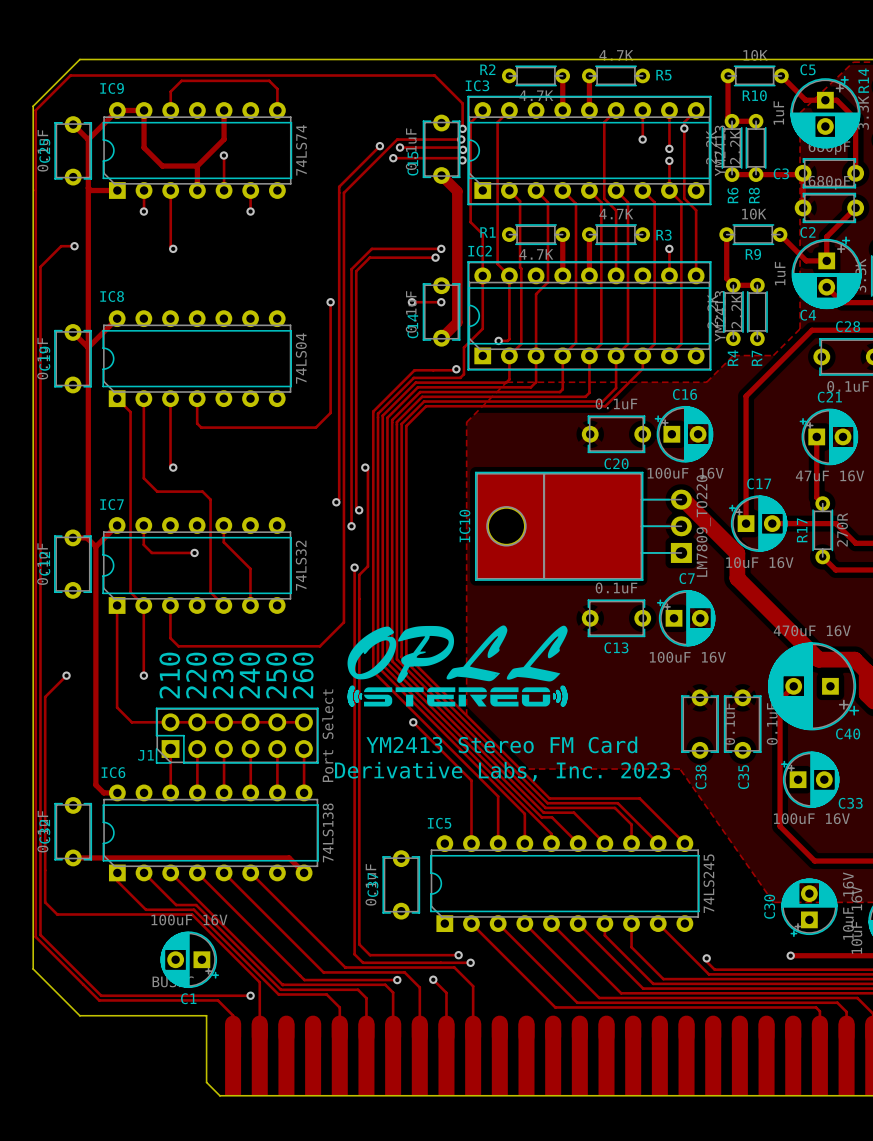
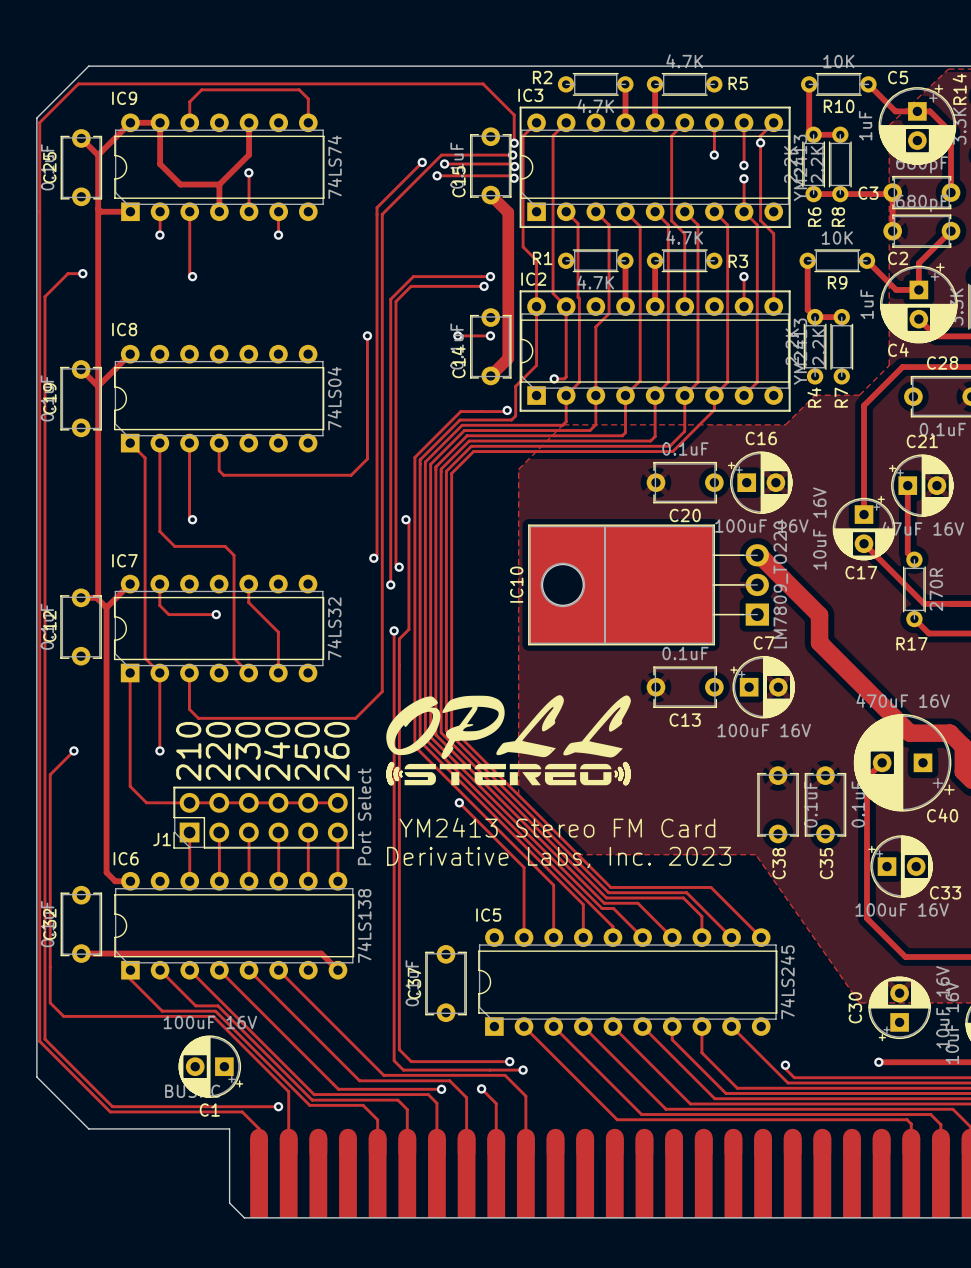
track: (777, 364) (746, 396) (746, 523) -> (864, 405) (864, 514)
C17 name position: C17 (759, 483) -> C17 (861, 572)
C17 rotation: 0° (758, 523) -> 90° clockwise (864, 528)
C17 position: (758, 523) -> (864, 528)
track: (772, 523) (836, 523) (855, 543) -> (864, 543) (924, 603) (951, 603)
R17 name rotation: 0° (802, 530) -> 90° clockwise (912, 643)
R17 name position: R17 (802, 530) -> R17 (912, 643)

